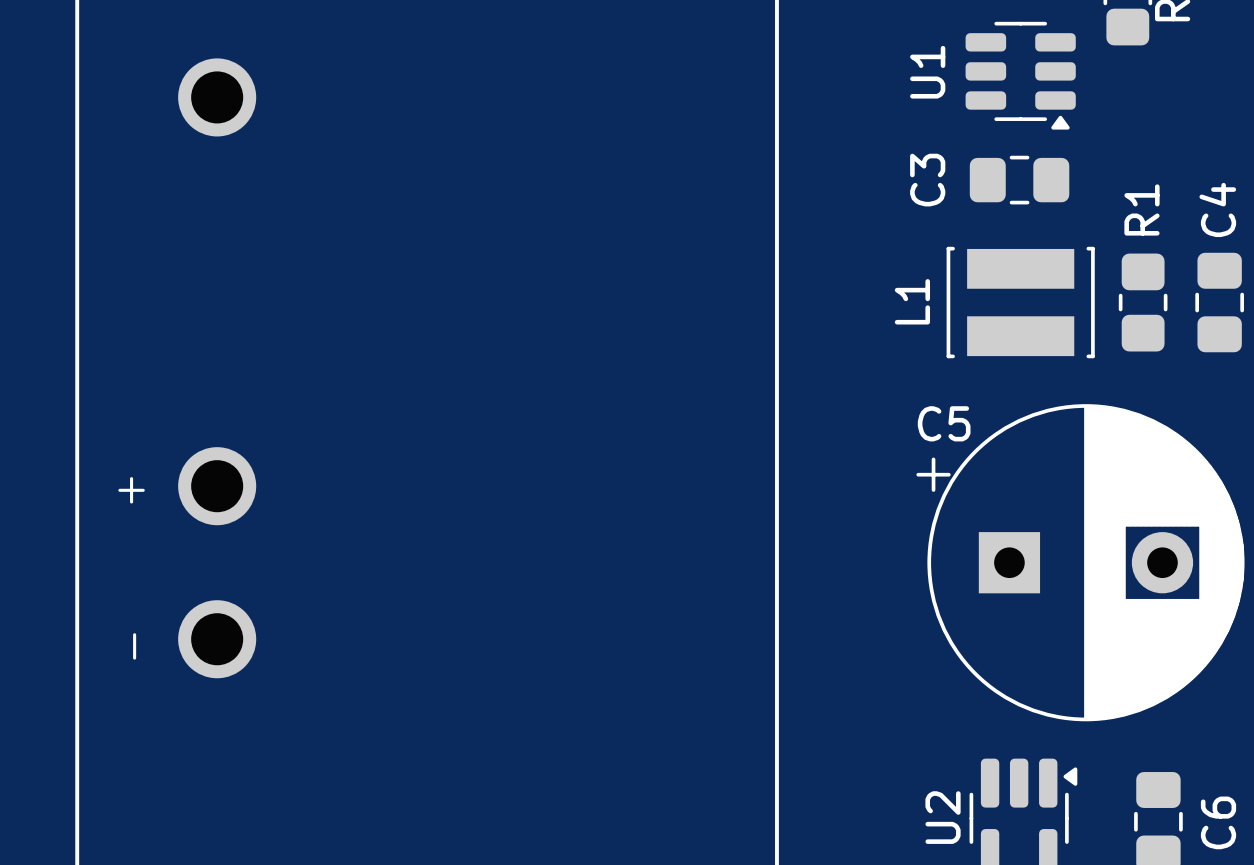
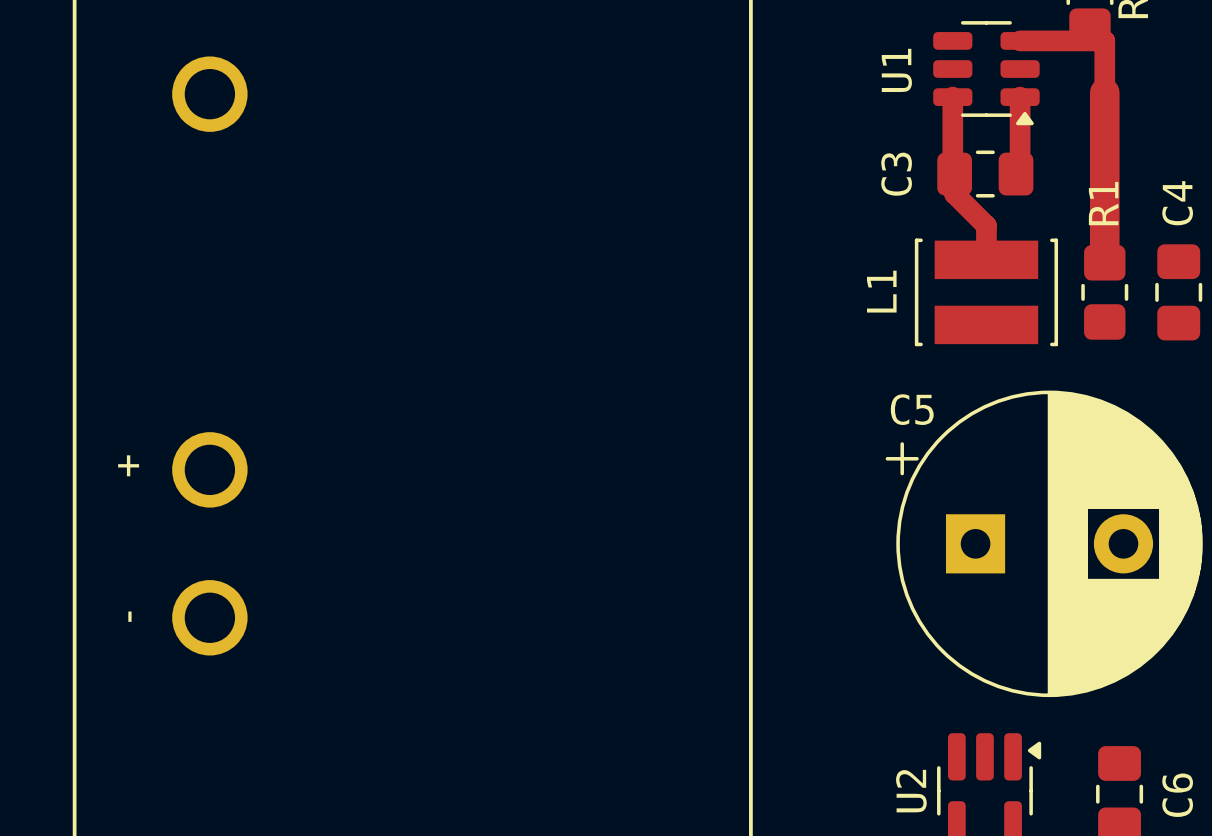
track: none -> (1020, 40) (1104, 40) (1104, 262)
track: none -> (952, 97) (954, 194) (986, 225) (986, 259)
track: none -> (1020, 97) (1020, 169) (1016, 174)

